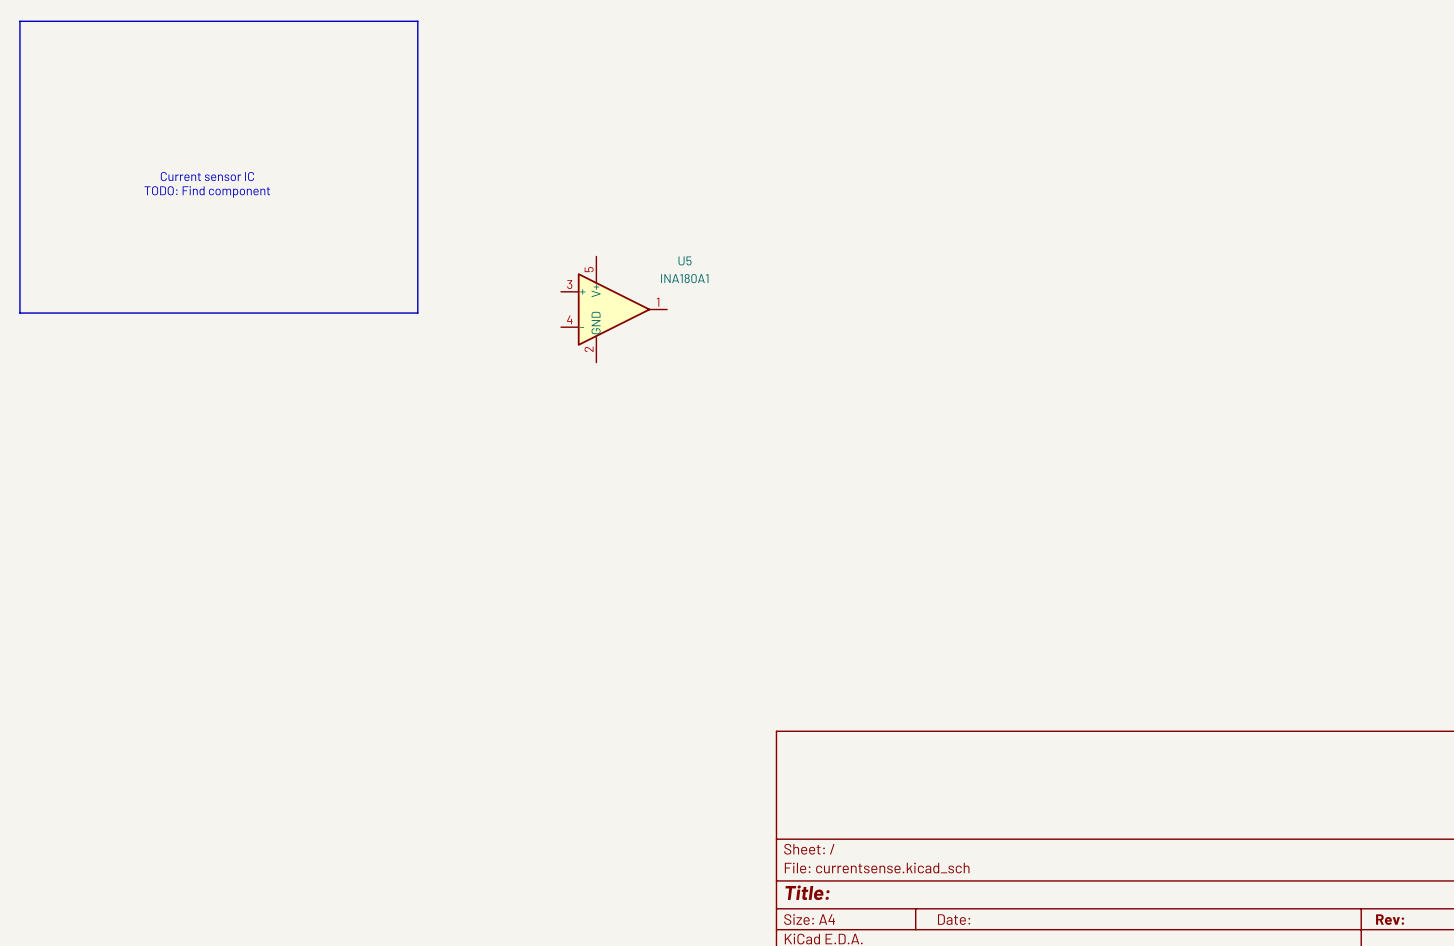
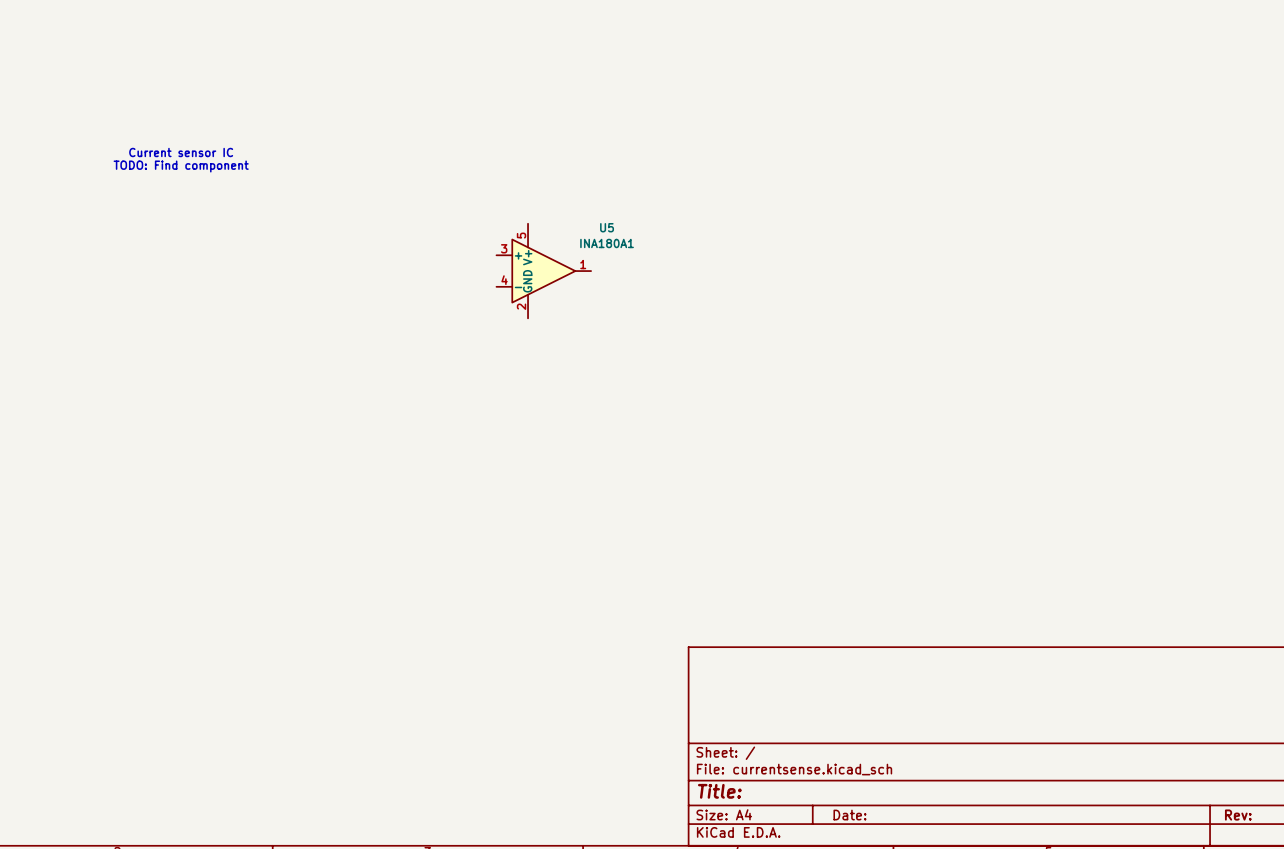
line: (19, 21) (417, 21) (417, 313) (19, 313) (19, 21) -> none

